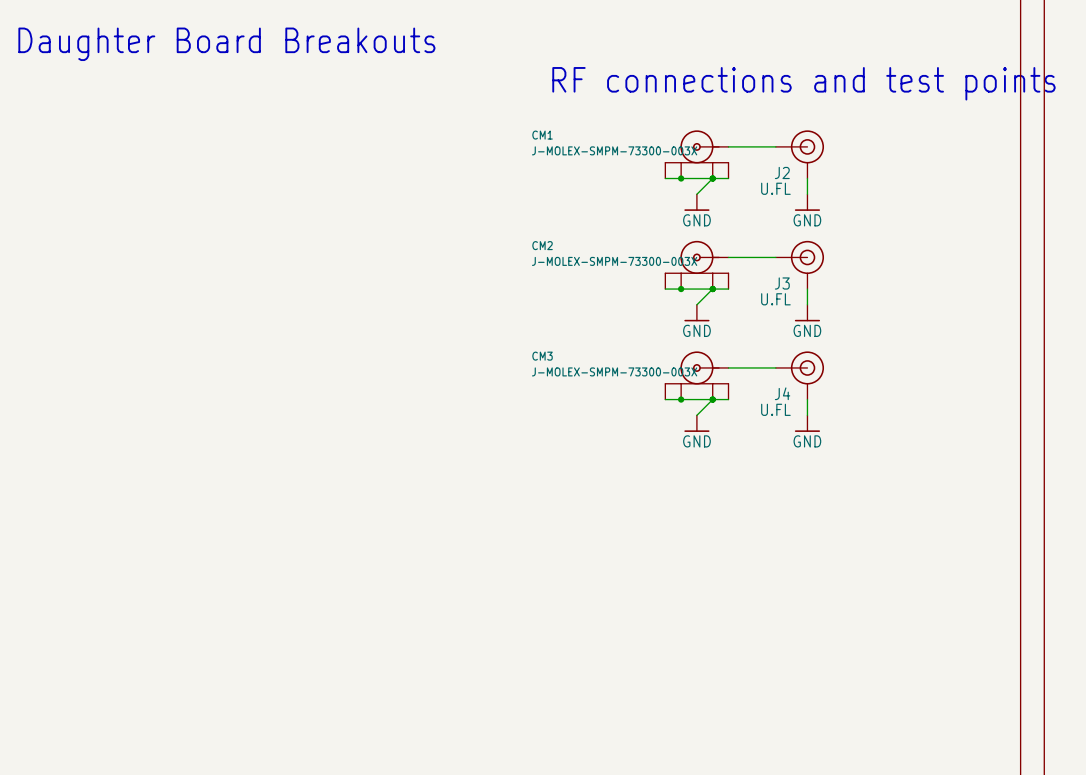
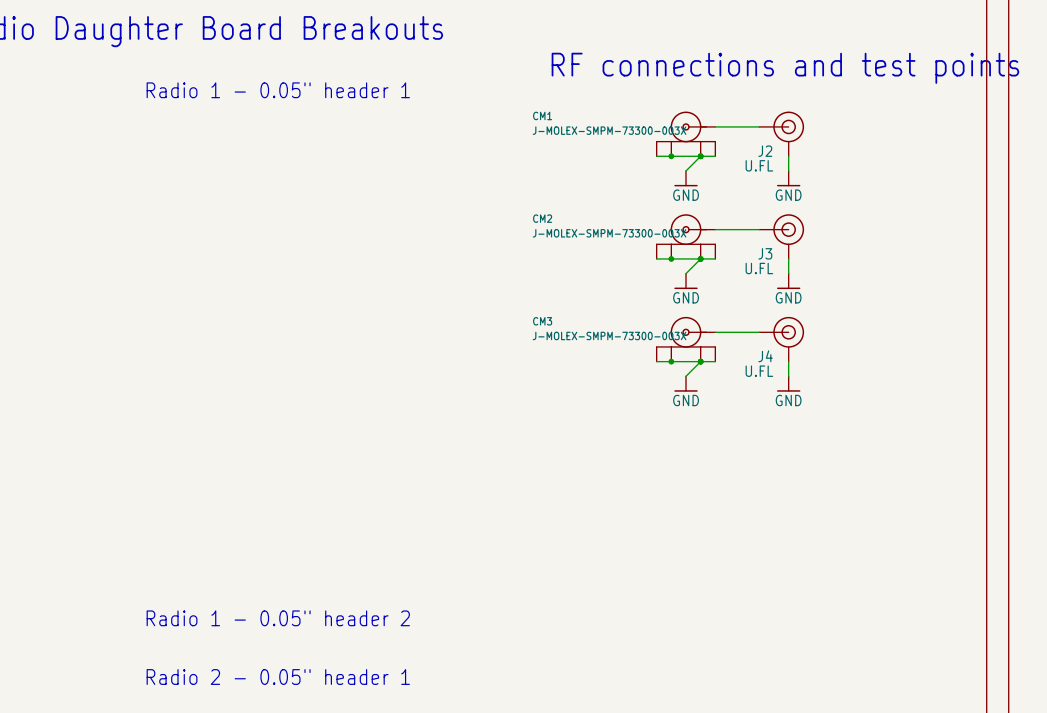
text: none -> Radio 1 - 0.05" header 1 (278, 90)
text: none -> Radio 1 - 0.05" header 2 (278, 618)
text: none -> Radio 2 - 0.05" header 1 (278, 677)

